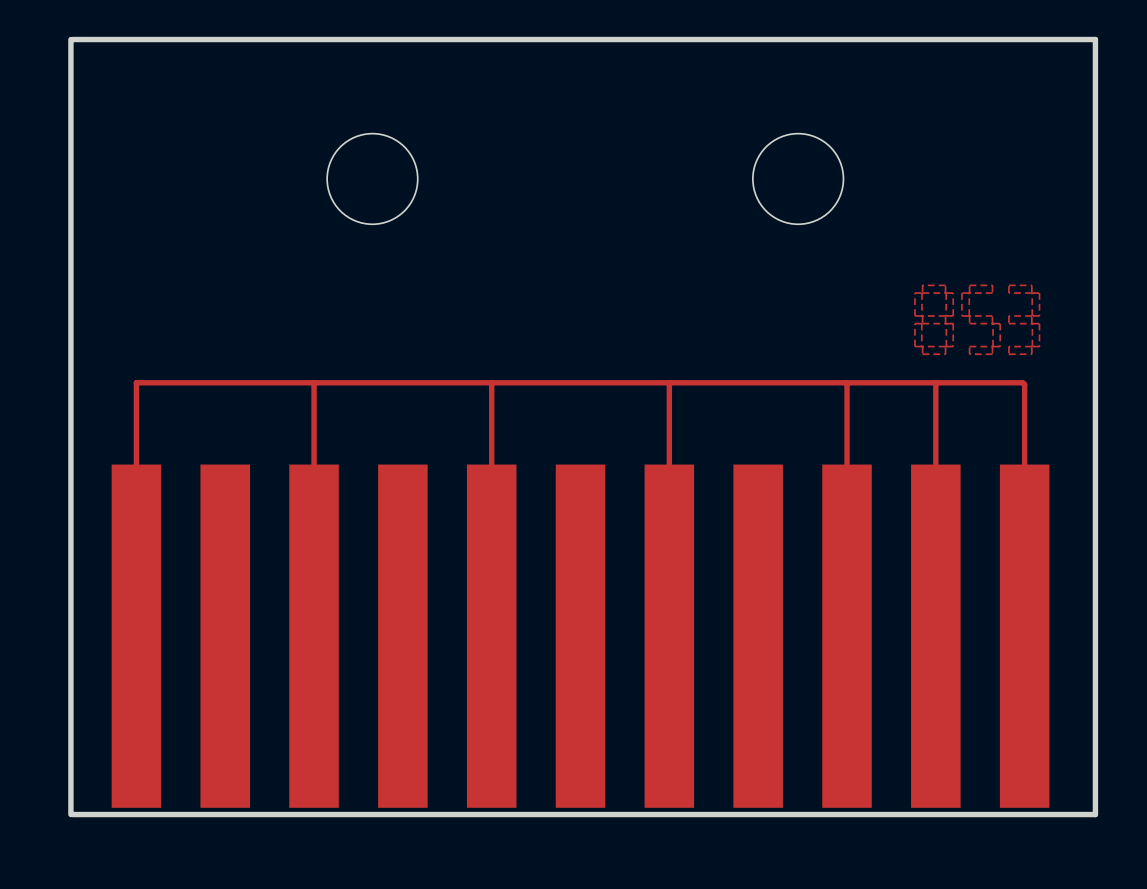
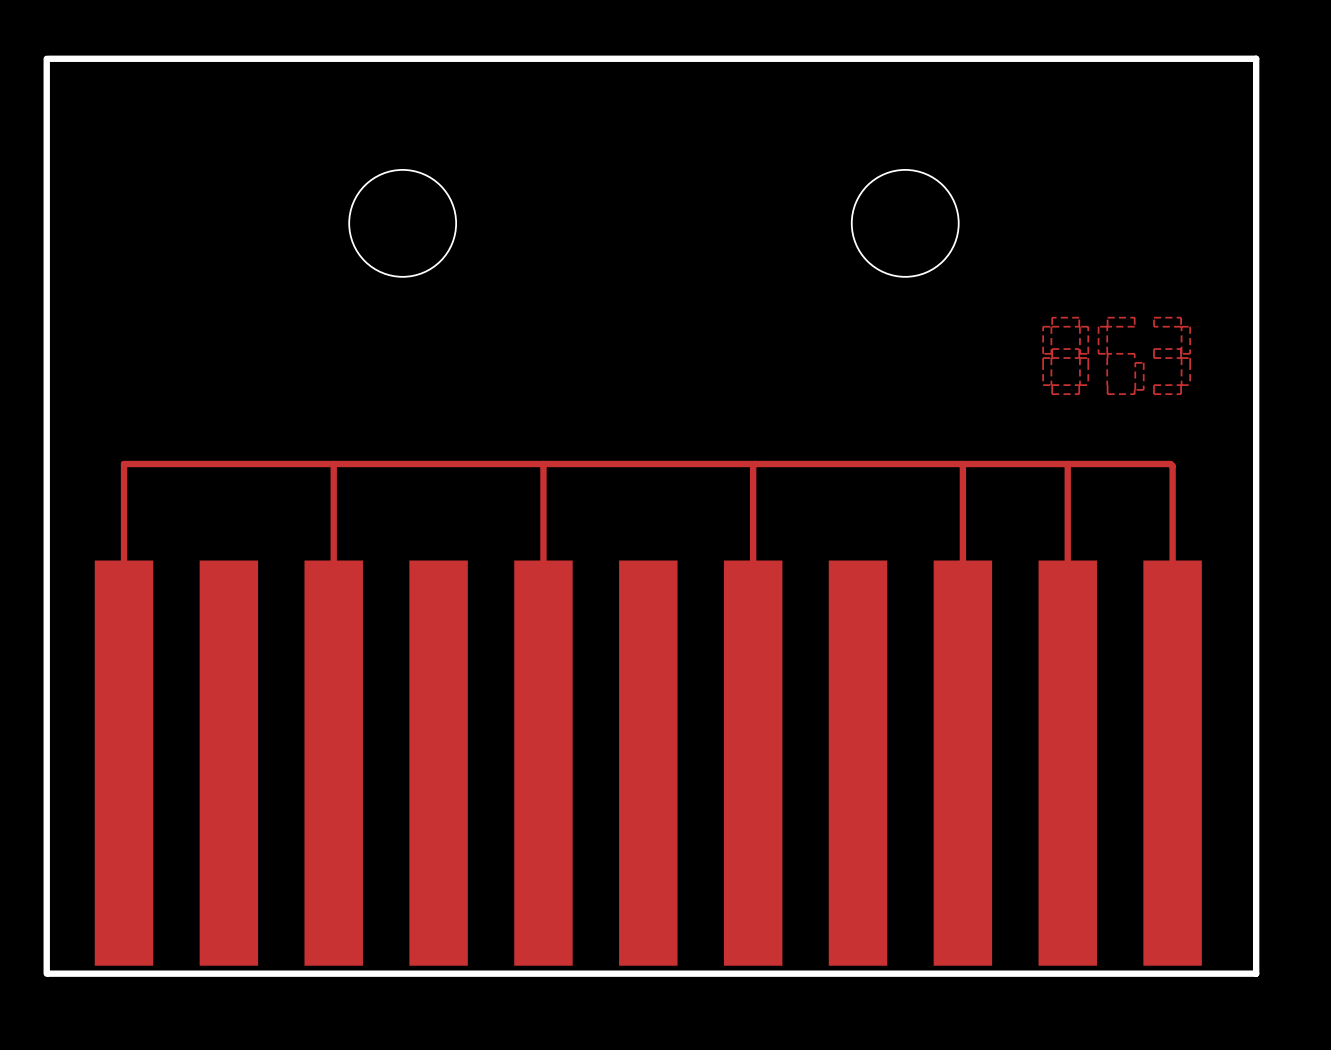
top zone outline: none -> (1107, 326) (1107, 353)
top zone outline: (969, 289) (969, 285) (992, 285) (992, 289) -> (1107, 326) (1107, 317) (1134, 317) (1134, 326) (1098, 326) (1098, 353) (1134, 353)
top zone outline: (992, 293) (961, 293) (961, 315) (992, 315) (992, 320) -> none
top zone outline: (914, 323) (914, 346) (921, 346) (921, 323) (914, 323) -> (1043, 326) (1043, 353) (1051, 353) (1051, 326) (1043, 326)
top zone outline: (946, 323) (953, 323) (953, 346) (946, 346) (946, 323) -> (1079, 326) (1088, 326) (1088, 353) (1079, 353) (1079, 326)
top zone outline: (993, 323) (1000, 323) (1000, 346) (993, 346) (993, 323) -> (1135, 362) (1143, 362) (1143, 389) (1135, 389) (1135, 362)
top zone outline: (1032, 323) (1039, 323) (1039, 346) (1032, 346) (1032, 323) -> (1181, 326) (1190, 326) (1190, 353) (1181, 353) (1181, 326)
top zone outline: (922, 346) (922, 354) (945, 354) (945, 346) (922, 346) -> (1052, 317) (1052, 326) (1079, 326) (1079, 317) (1052, 317)
top zone outline: (969, 346) (992, 346) (992, 354) (969, 354) (969, 346) -> none
top zone outline: (1008, 346) (1031, 346) (1031, 354) (1008, 354) (1008, 346) -> (1154, 317) (1181, 317) (1181, 326) (1154, 326) (1154, 317)

